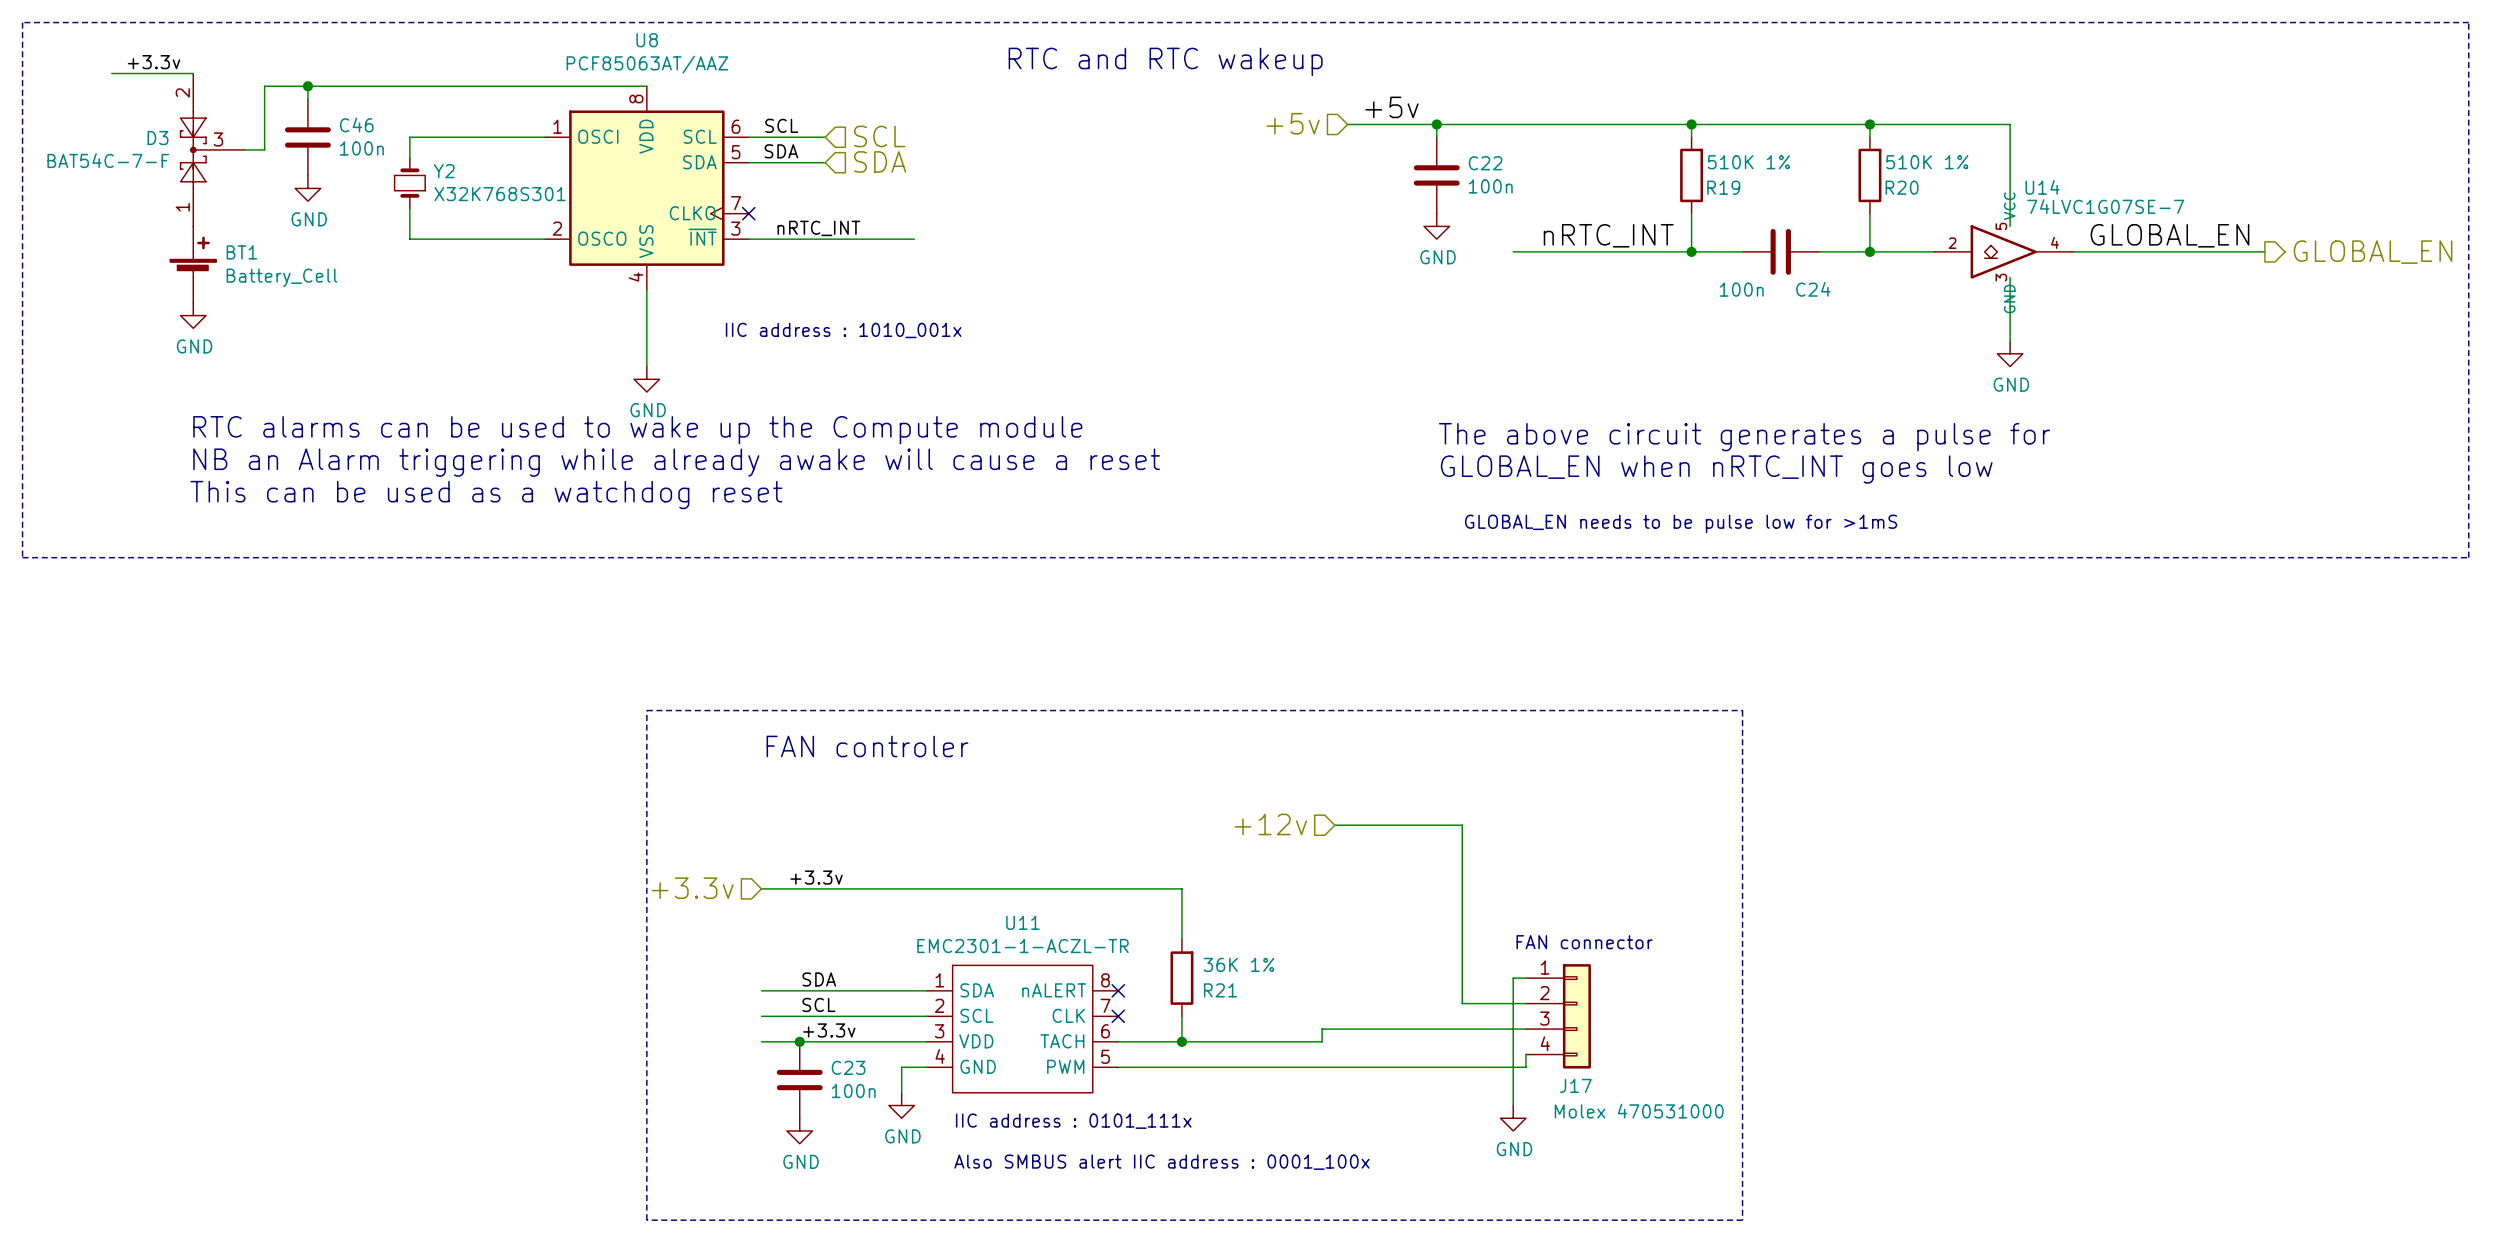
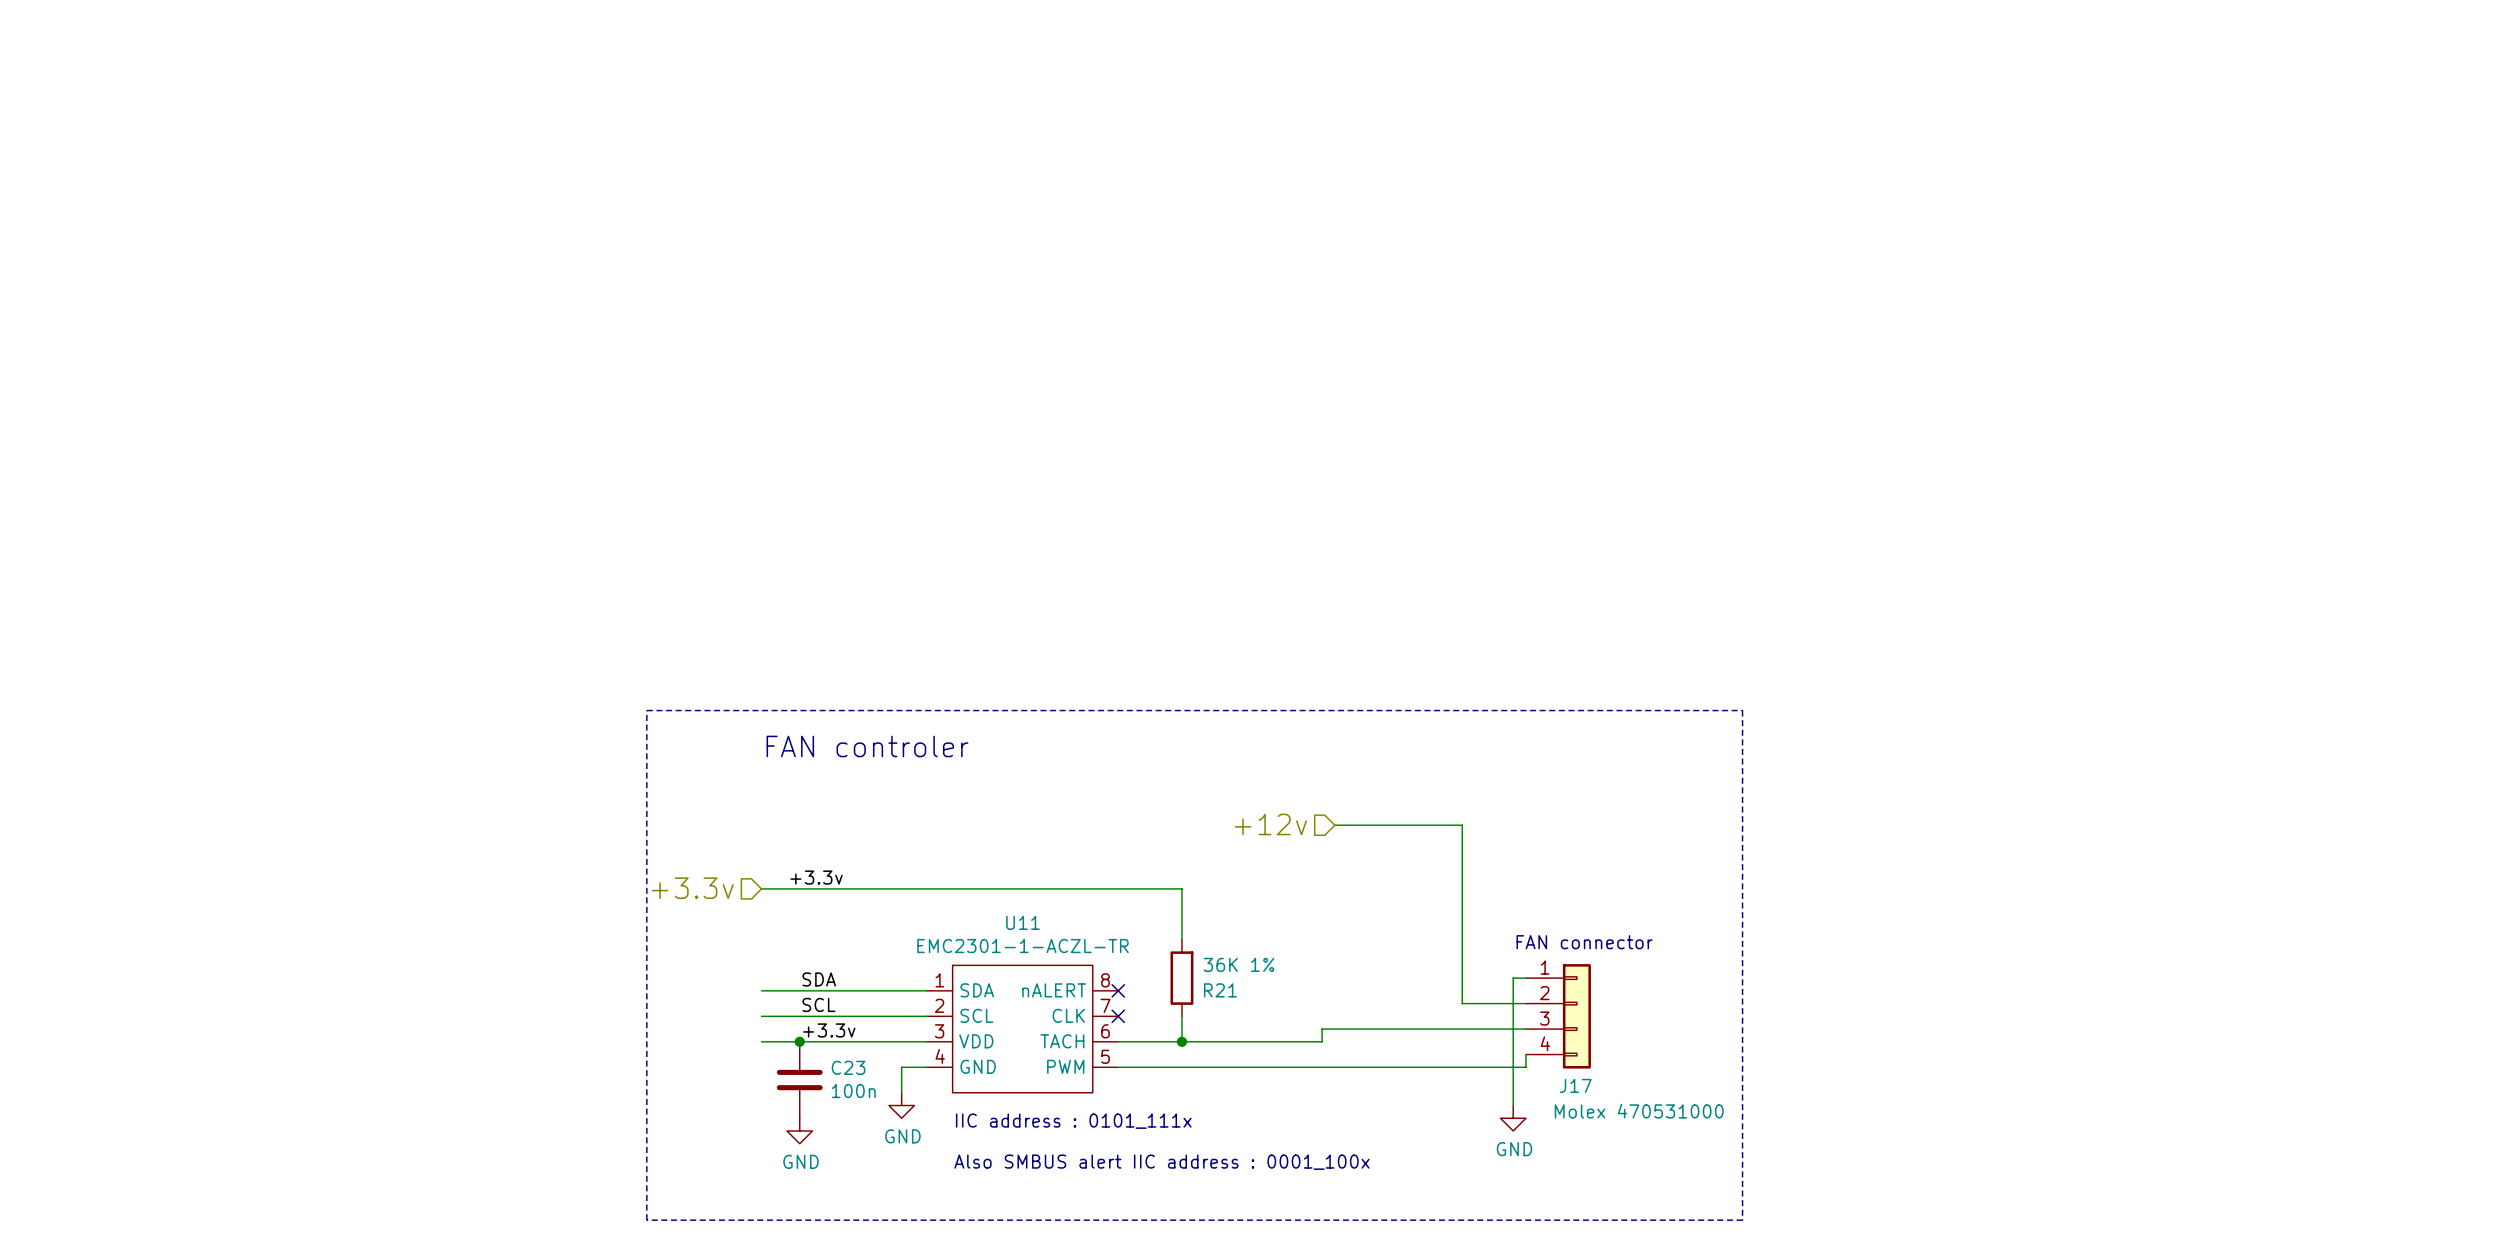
line: (22, 22) (22, 557) (2468, 557) (2468, 22) (22, 22) -> none
text: RTC and RTC wakeup (1165, 61) -> none
label: +3.3v (154, 62) -> none
wire: (111, 73) (193, 73) -> none
wire: (307, 86) (307, 99) -> none
junction: (307, 86) -> none
wire: (646, 86) (264, 86) (264, 149) (244, 149) -> none
label: +5v (1392, 107) -> none
hierarchical label: +5v (1293, 123) -> none
wire: (1347, 124) (2010, 124) (2010, 226) -> none
wire: (1436, 124) (1436, 137) -> none
junction: (1436, 124) -> none
wire: (1691, 124) (1691, 137) -> none
junction: (1691, 124) -> none
wire: (1869, 124) (1869, 137) -> none
junction: (1869, 124) -> none
label: SCL (781, 125) -> none
hierarchical label: SCL (879, 136) -> none
C46: 100n (307, 137) -> none
wire: (544, 137) (409, 137) (409, 157) -> none
wire: (748, 137) (825, 137) -> none
D3: BAT54C-7-F (212, 149) -> none
label: SDA (781, 151) -> none
hierarchical label: SDA (880, 161) -> none
wire: (748, 162) (825, 162) -> none
C22: 100n (1436, 175) -> none
R19: 510K 1% (1691, 175) -> none
R20: 510K 1% (1869, 175) -> none
Y2: X32K768S301 (409, 183) -> none
power symbol: GND (307, 188) -> none
U8: PCF85063AT/AAZ (646, 188) -> none
wire: (409, 208) (409, 239) (544, 239) -> none
no-connect mark: (748, 213) -> none
wire: (1691, 213) (1691, 251) -> none
wire: (1869, 213) (1869, 251) -> none
power symbol: GND (1436, 226) -> none
label: nRTC_INT (818, 228) -> none
label: nRTC_INT (1608, 235) -> none
label: GLOBAL_EN (2169, 235) -> none
wire: (748, 239) (914, 239) -> none
wire: (1513, 251) (1742, 251) -> none
junction: (1691, 251) -> none
C24: 100n (1780, 251) -> none
wire: (1818, 251) (1933, 251) -> none
junction: (1869, 251) -> none
U14: 74LVC1G07SE-7 (2003, 251) -> none
wire: (2073, 251) (2264, 251) -> none
hierarchical label: GLOBAL_EN (2373, 252) -> none
BT1: Battery_Cell (193, 264) -> none
wire: (2010, 277) (2010, 341) -> none
wire: (646, 290) (646, 366) -> none
power symbol: GND (193, 315) -> none
text: IIC address : 1010_001x (843, 330) -> none
power symbol: GND (2010, 353) -> none
power symbol: GND (646, 379) -> none
text: RTC alarms can be used to wake up the Compute module (637, 430) -> none
text: The above circuit generates a pulse for (1744, 437) -> none
text: NB an Alarm triggering while already awake will cause a reset (676, 462) -> none
text: GLOBAL_EN when nRTC_INT goes low (1716, 469) -> none
text: This can be used as a watchdog reset (486, 495) -> none
text: GLOBAL_EN needs to be pulse low for >1mS (1681, 523) -> none

